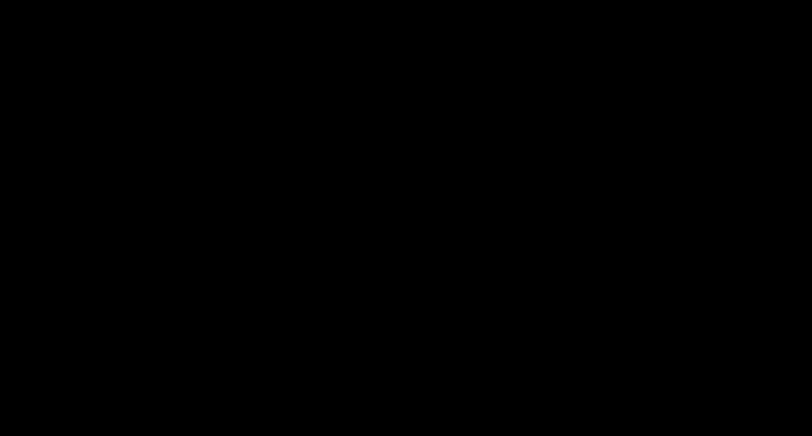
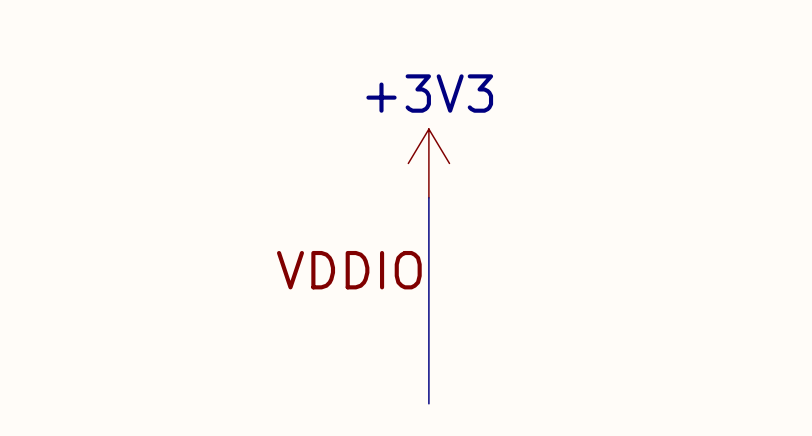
power symbol: none -> +3V3 (428, 163)
wire: none -> (428, 197) (428, 403)
label: none -> VDDIO (349, 270)

